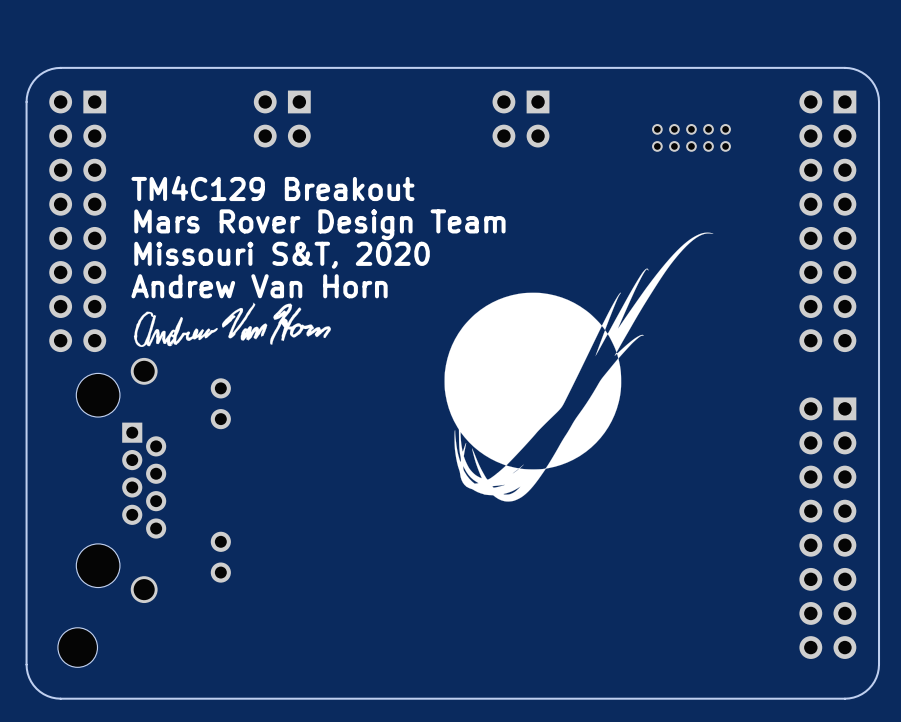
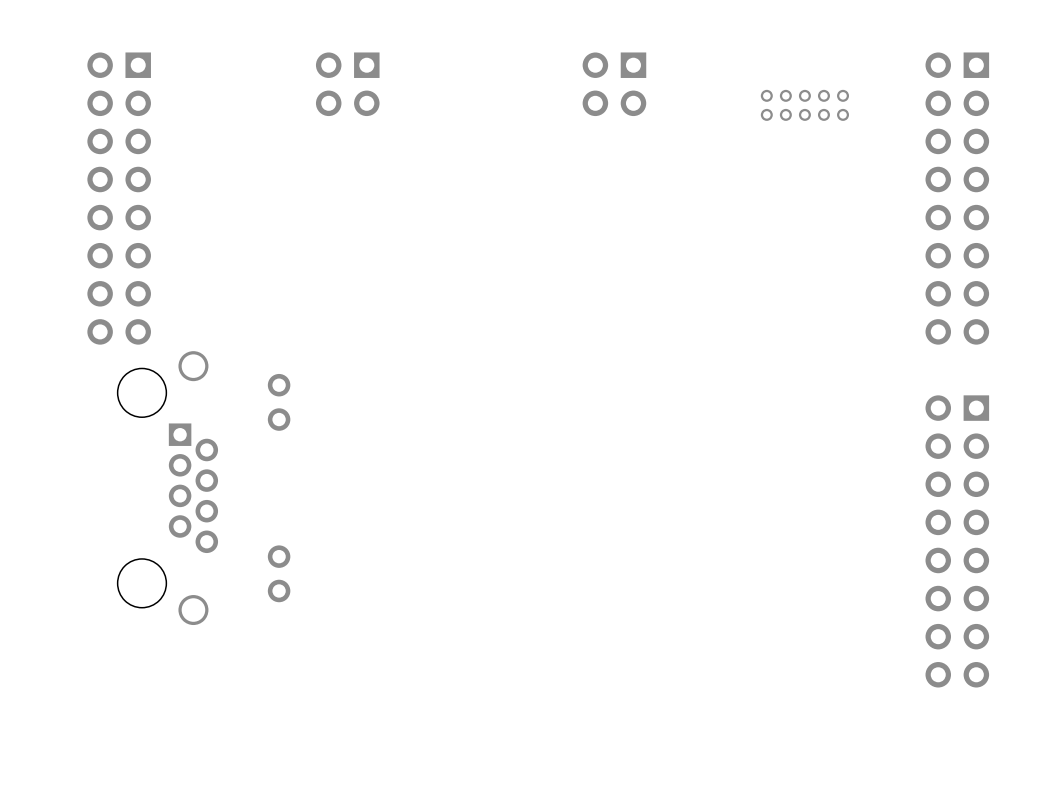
board edge: (844, 67) (60, 67) (51, 69) (39, 74) (31, 84) (26, 101) (26, 664) (27, 673) (33, 685) (43, 694) (60, 698) (844, 698) (853, 697) (865, 691) (876, 677) (879, 664) (879, 101) (876, 88) (869, 77) (857, 70) (844, 67) -> none
text: TM4C129 Breakout (272, 188) -> none
text: Mars Rover Design Team (319, 224) -> none
drawing: [444, 232, 714, 502] -> none
text: Missouri S&T, 2020 (282, 255) -> none
text: Andrew Van Horn (259, 286) -> none
drawing: [133, 302, 331, 347] -> none
part: (77, 647) -> none

